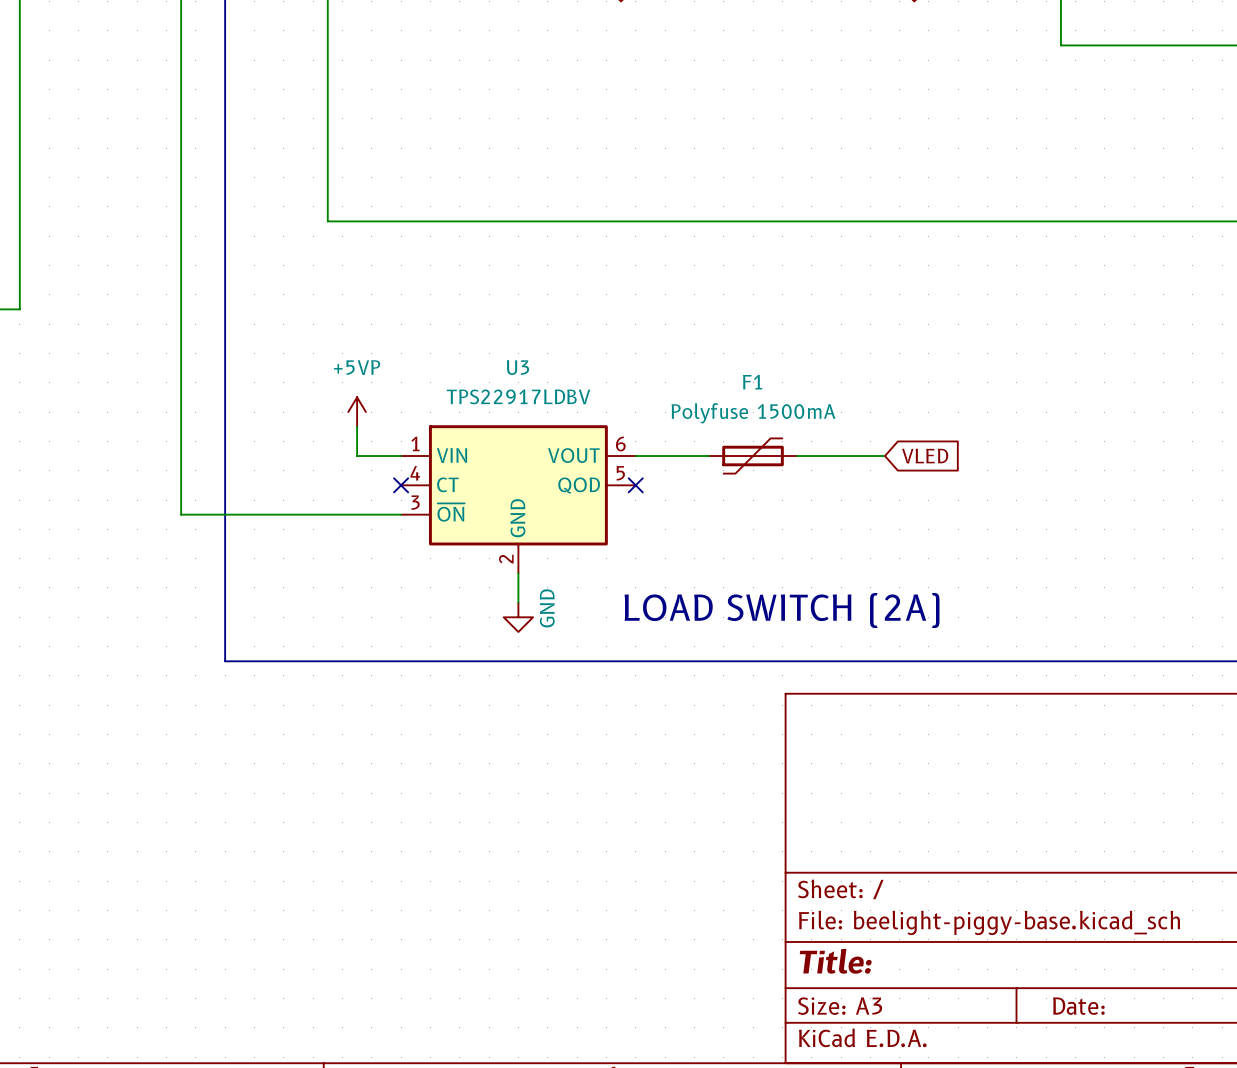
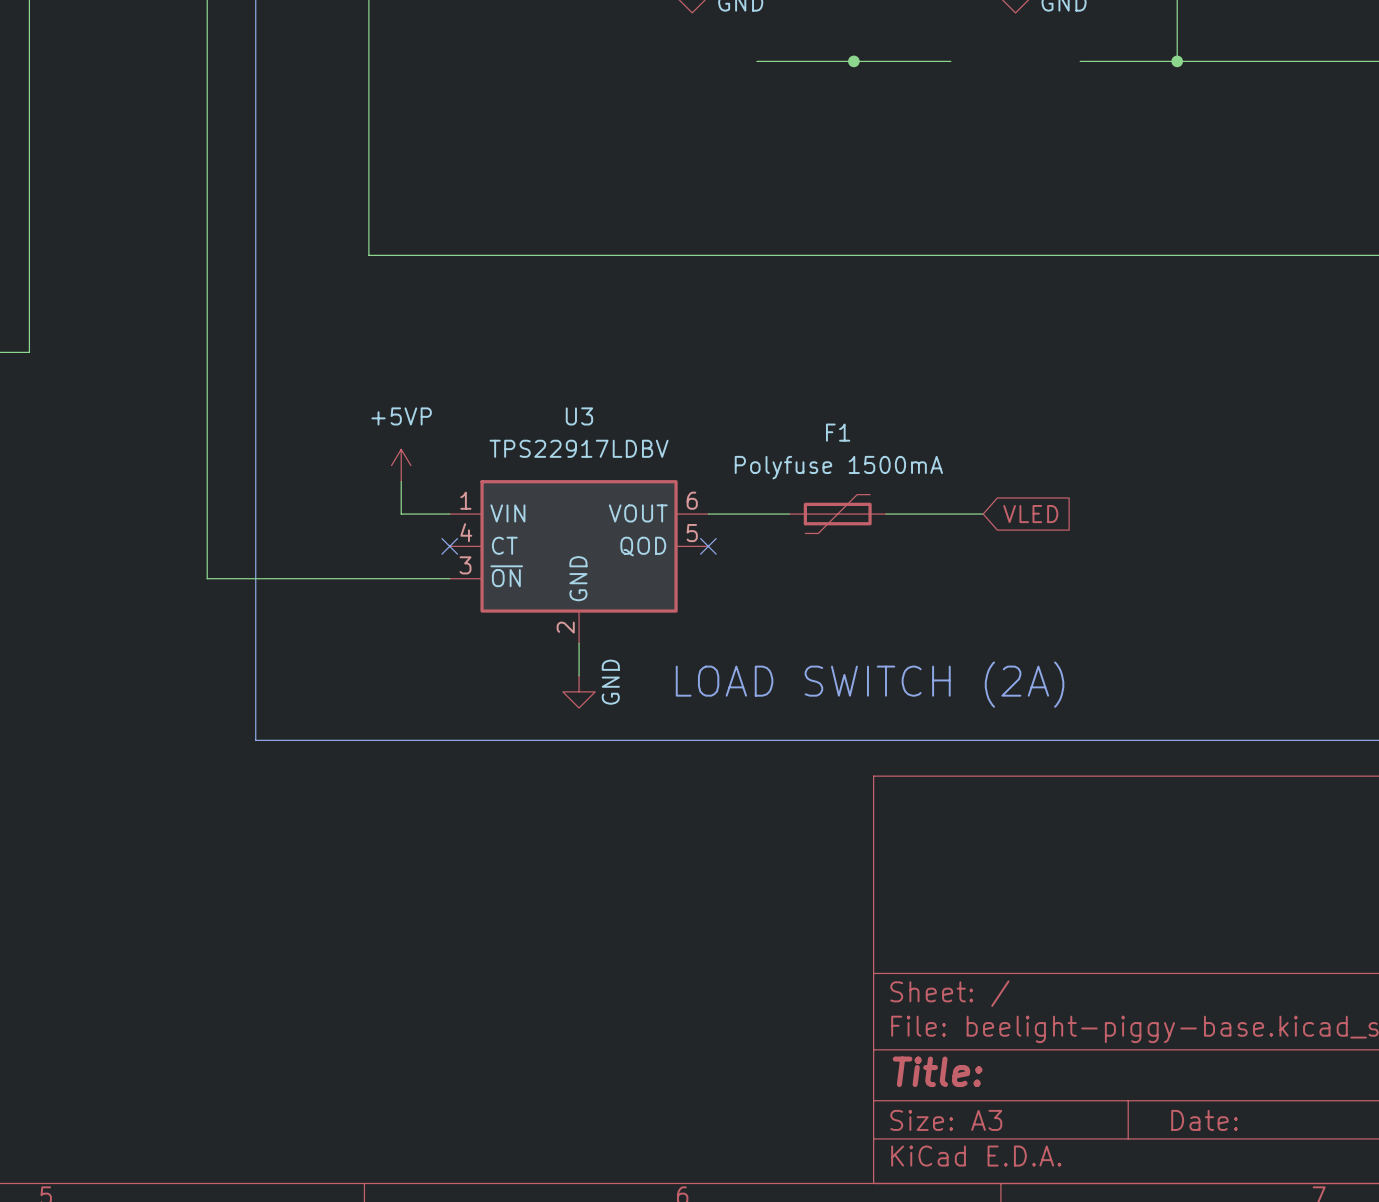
wire: none -> (756, 61) (950, 61)
junction: none -> (853, 61)
wire: none -> (1080, 61) (1177, 61)
junction: none -> (1177, 61)

